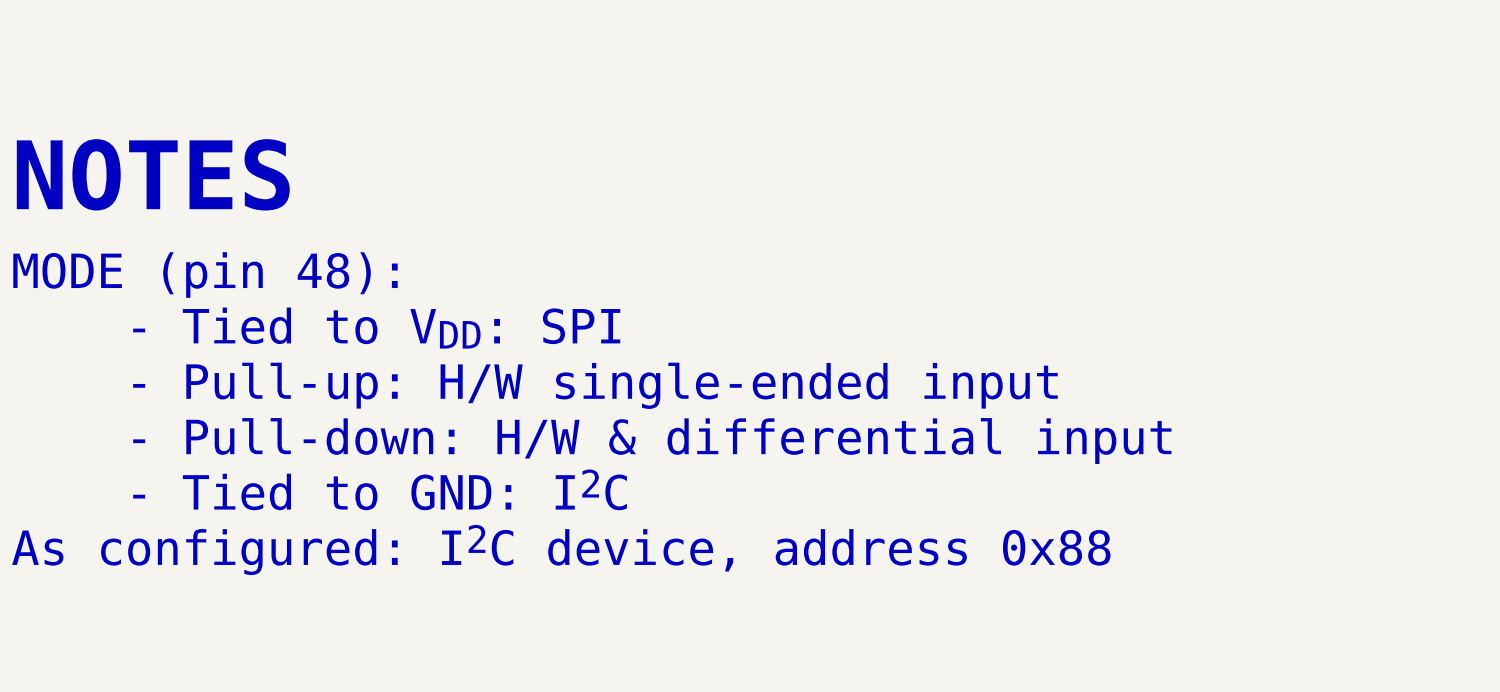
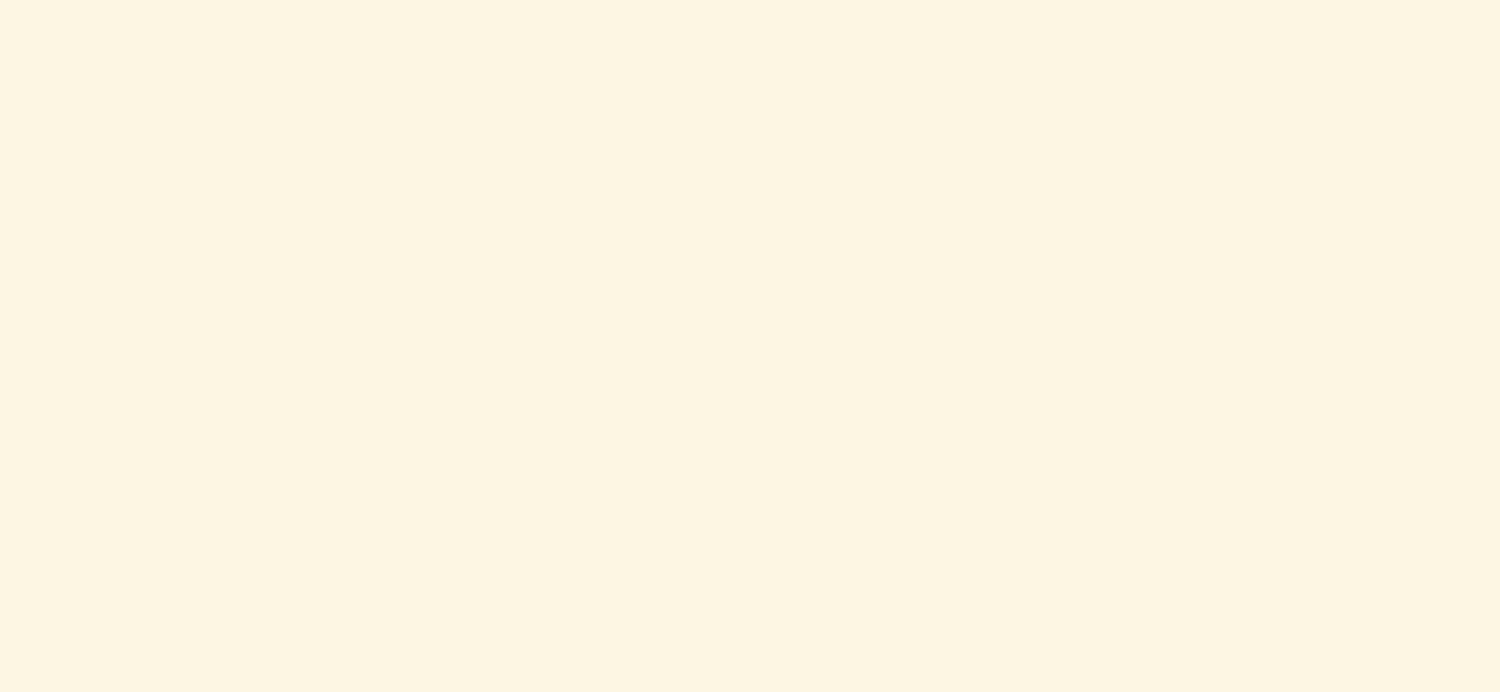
text: NOTES (153, 174) -> none
text: MODE (pin 48): (205, 275) -> none
text: - Tied to VDD: SPI (376, 328) -> none
text: - Pull-up: H/W single-ended input (595, 385) -> none
text: - Pull-down: H/W & differential input (652, 441) -> none
text: - Tied to GND: I2C (380, 489) -> none
text: As configured: I2C device, address 0x88 (561, 549) -> none

